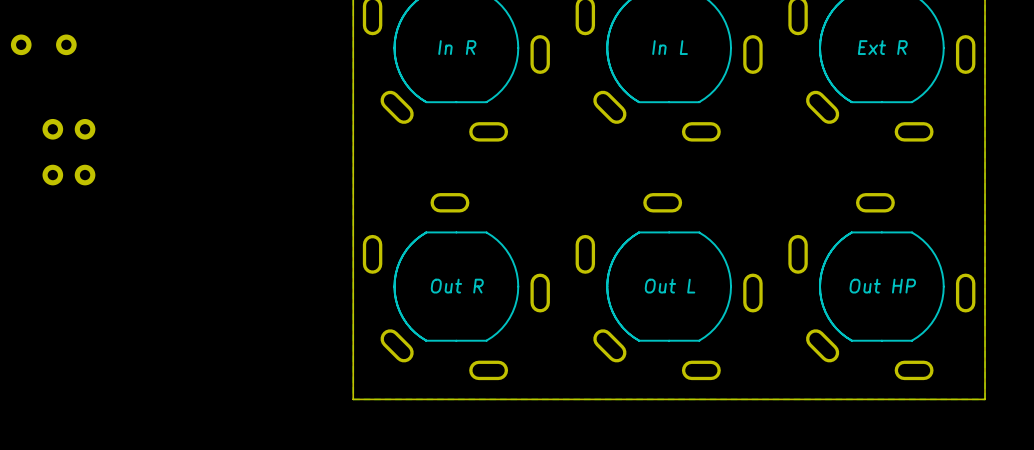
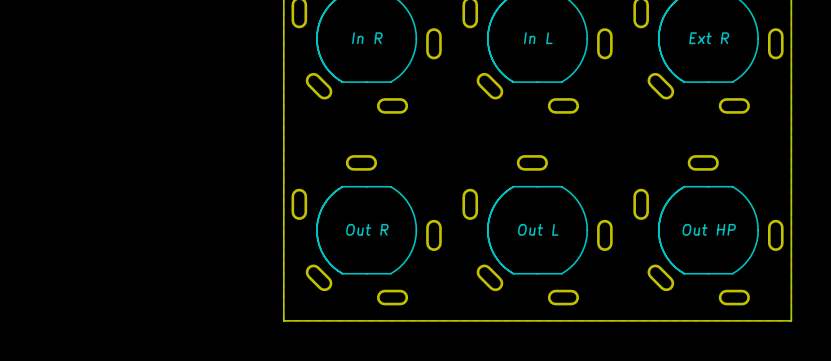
part: (43, 44) -> none
part: (68, 129) -> none
part: (68, 175) -> none

